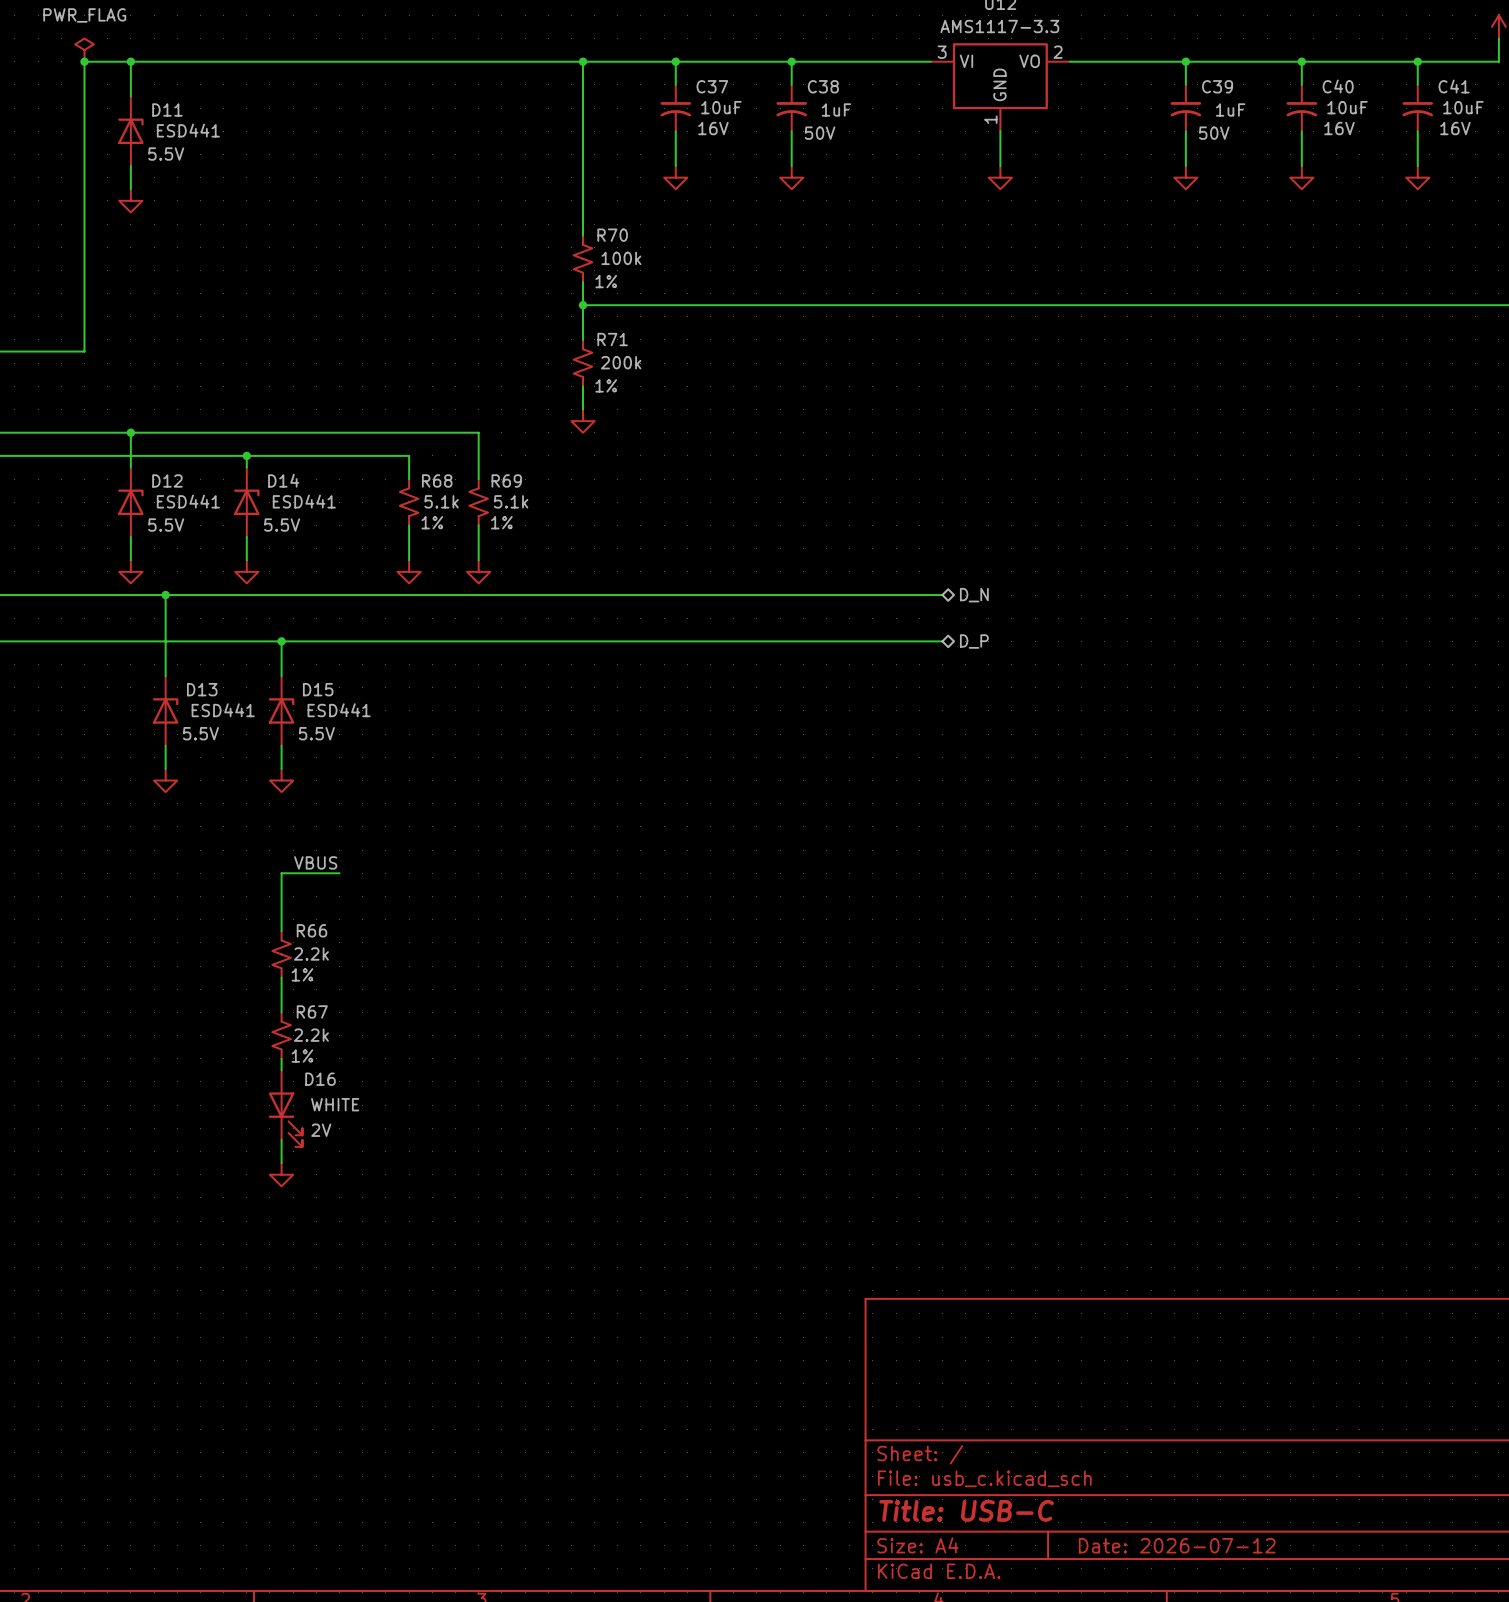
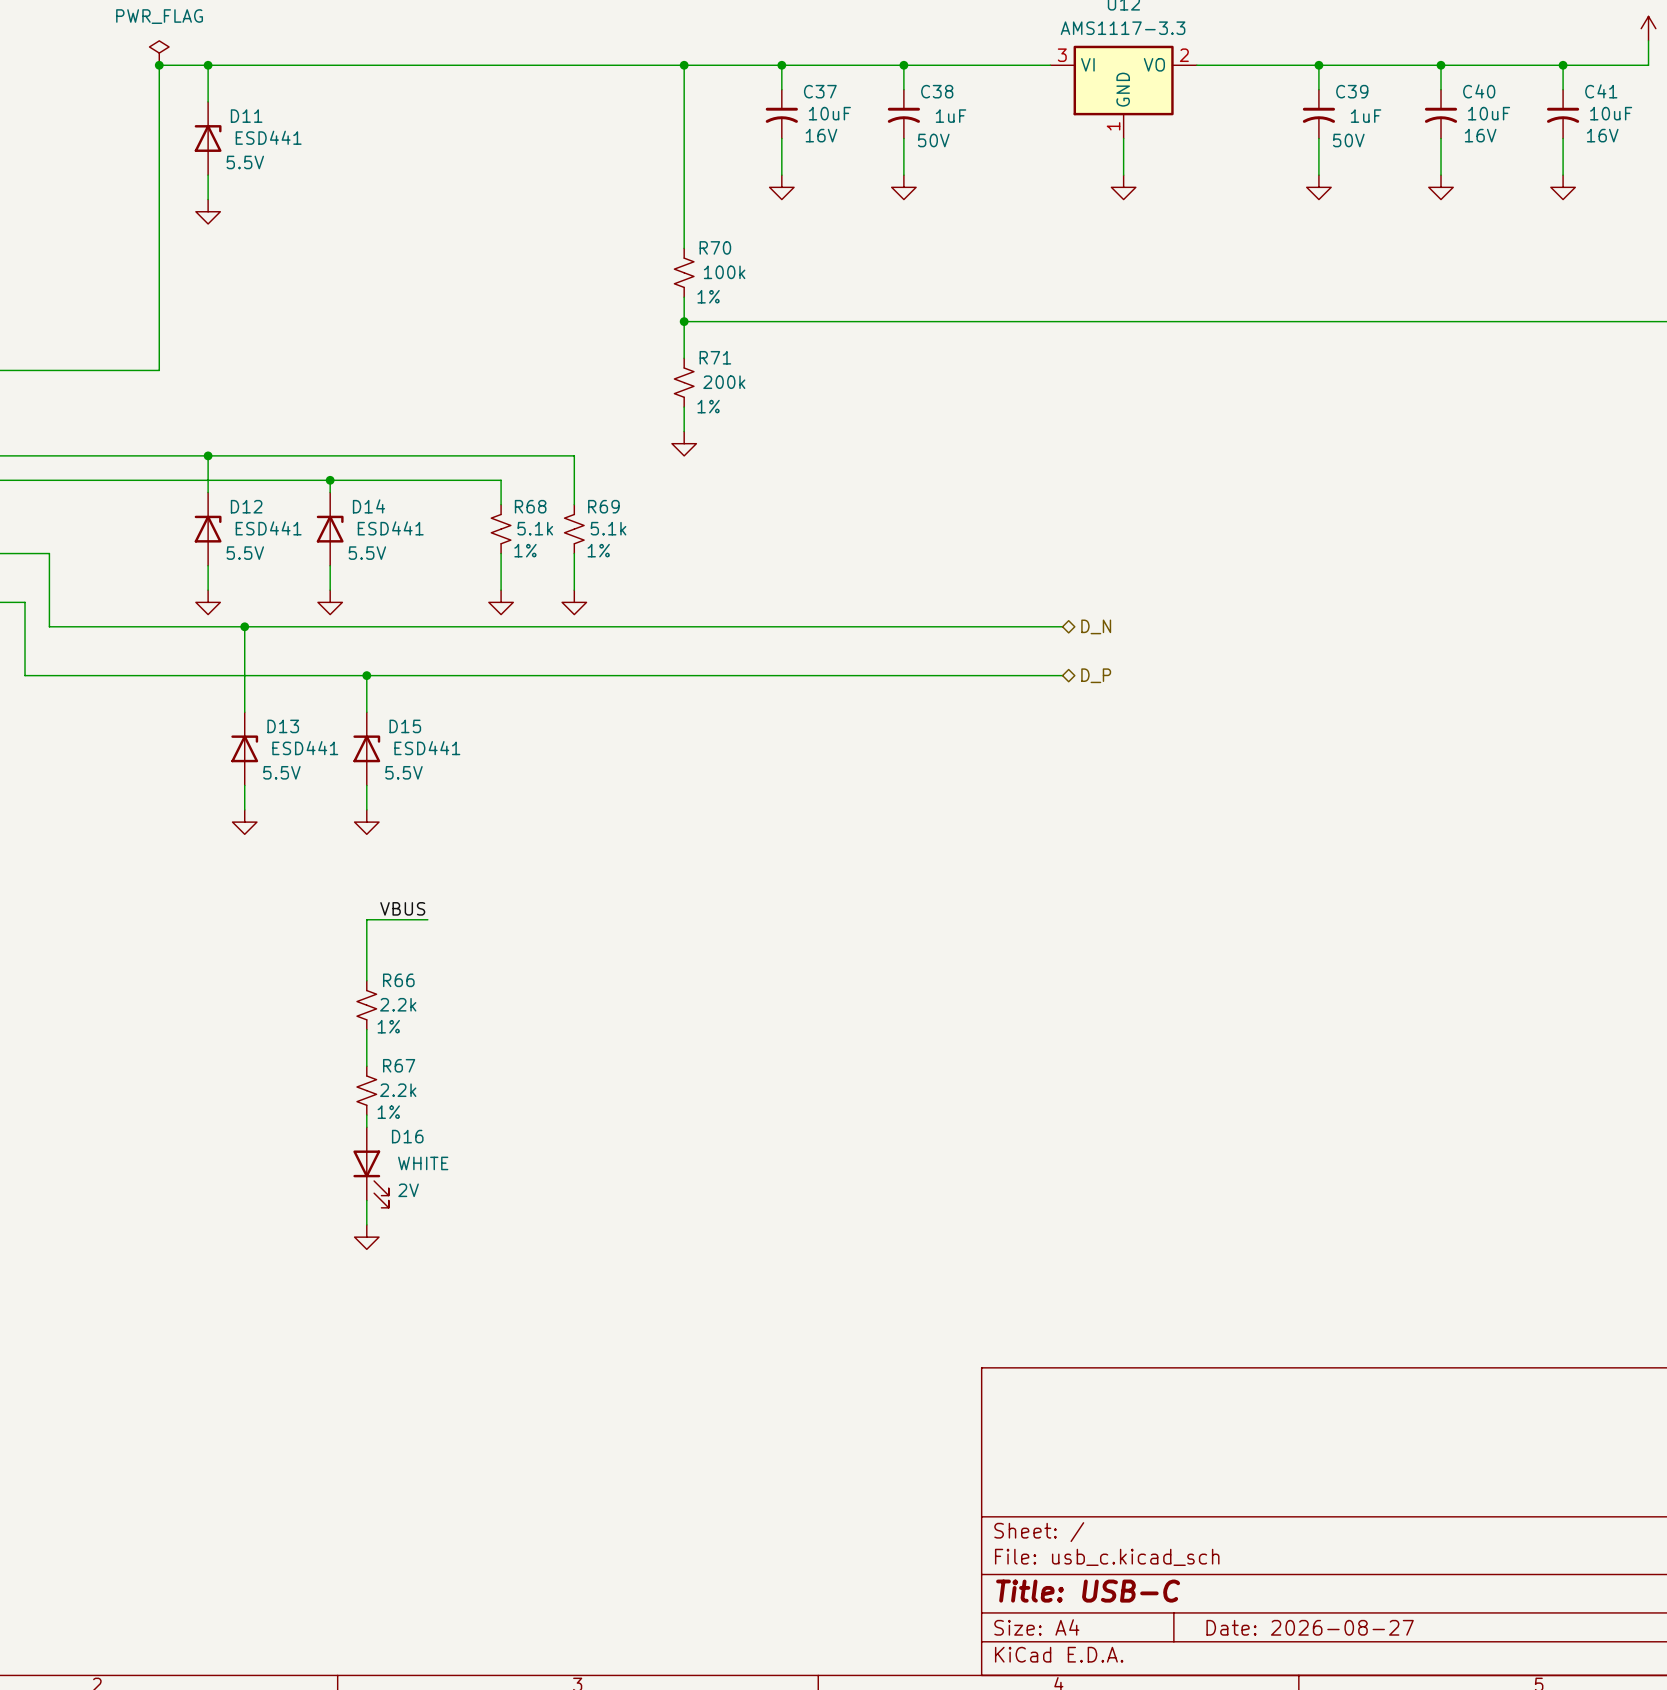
title block: Date: 2026-07-12 (1177, 1545) -> Date: 2026-08-27 (1310, 1627)

